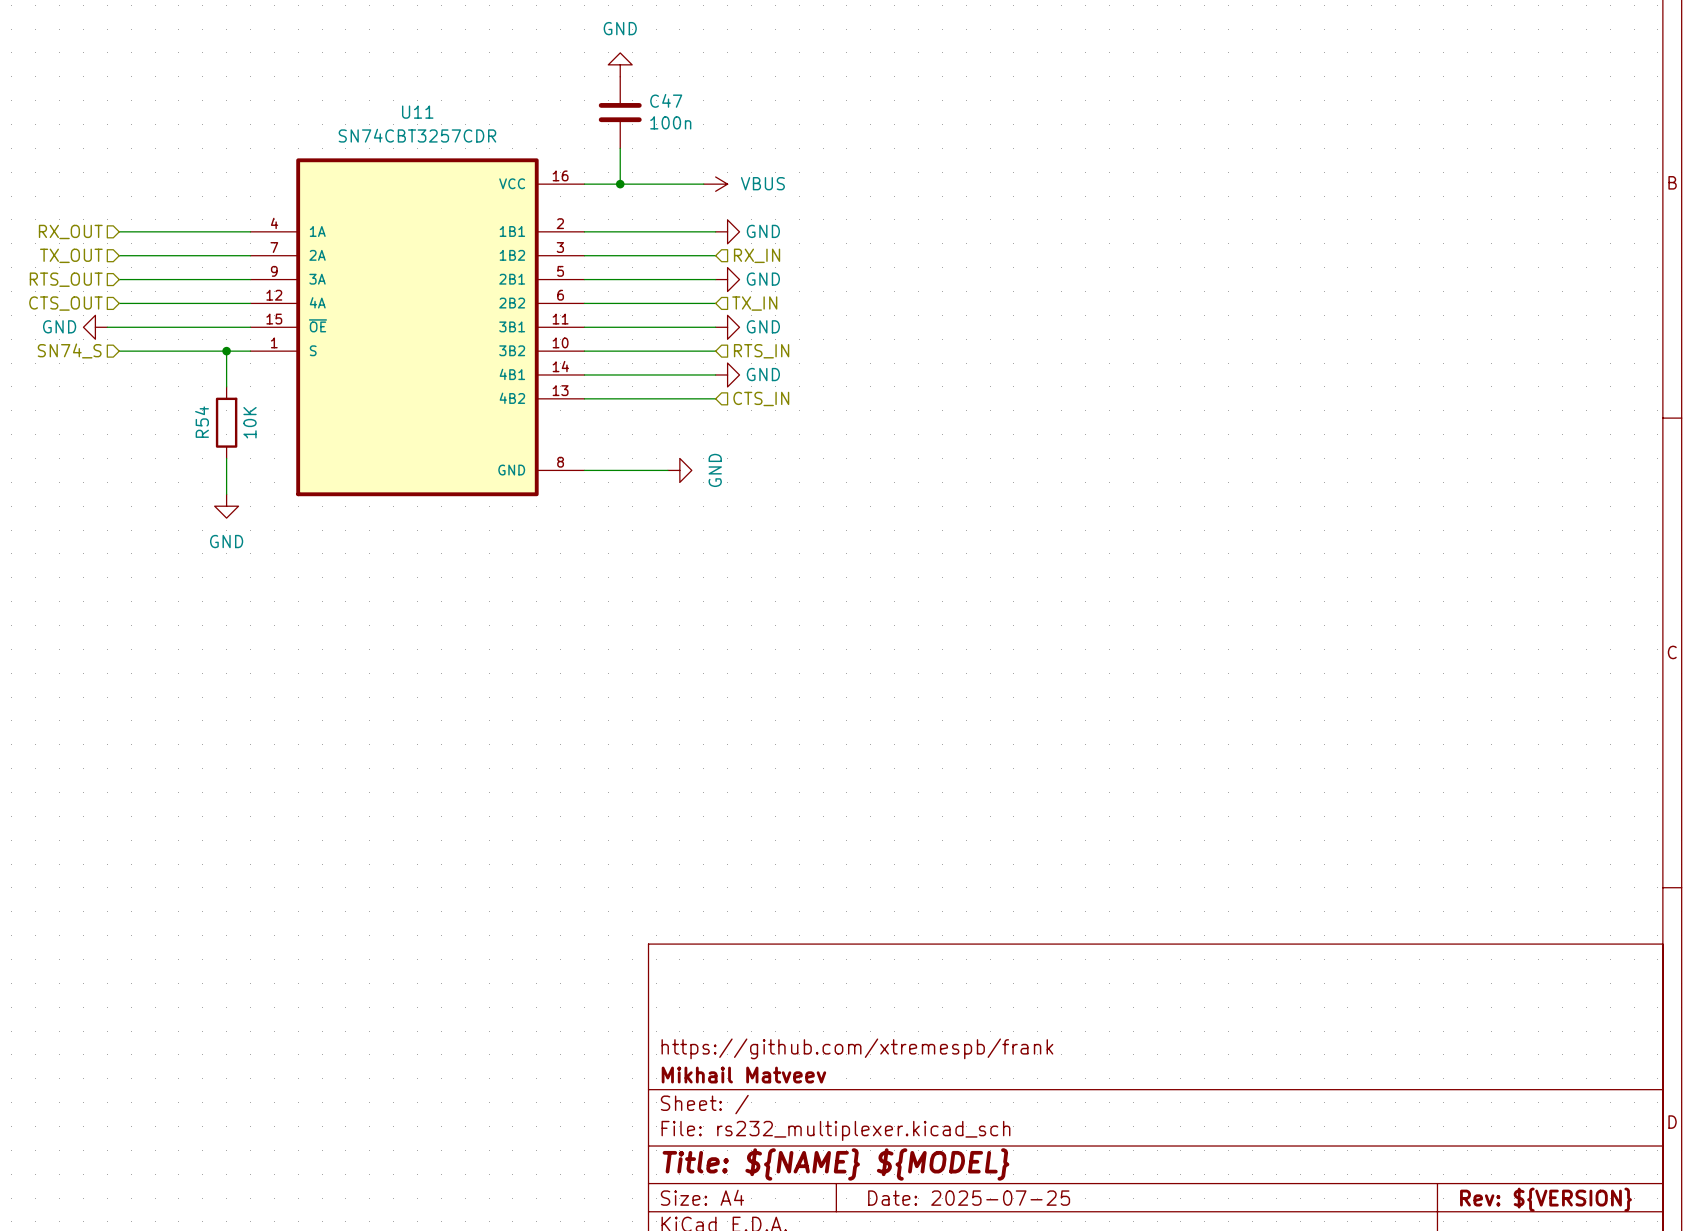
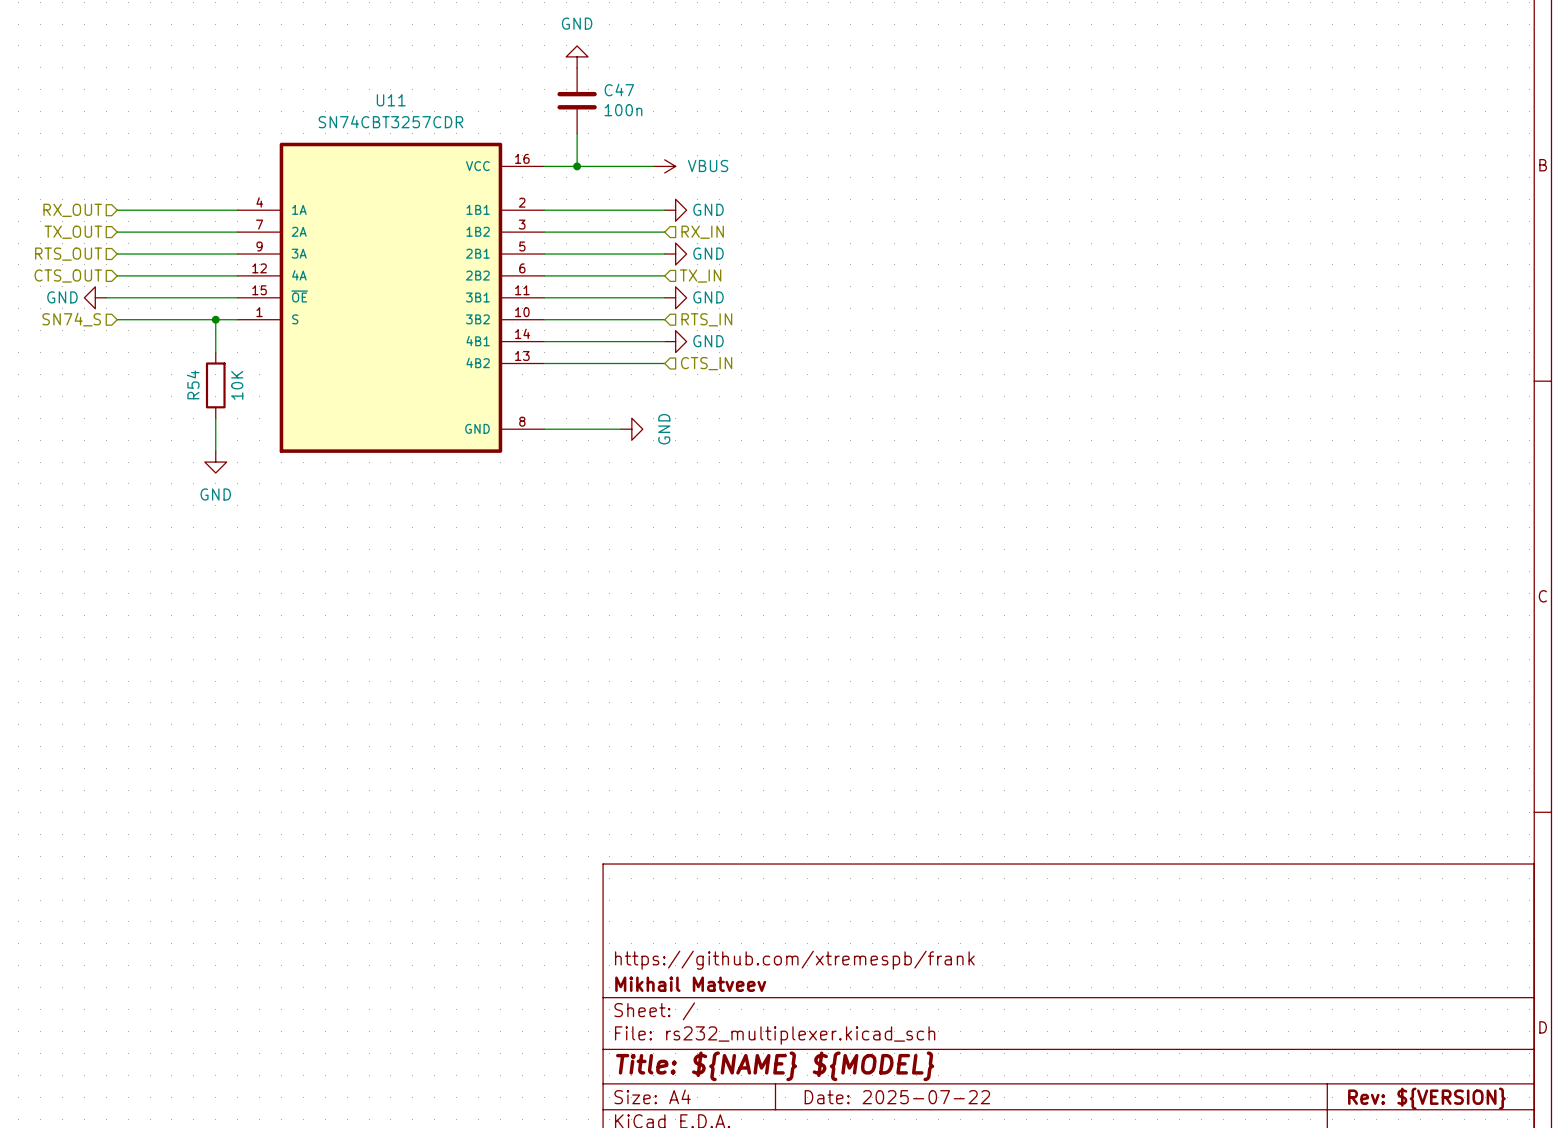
title block: Date: 2025-07-25 (969, 1198) -> Date: 2025-07-22 (897, 1097)

